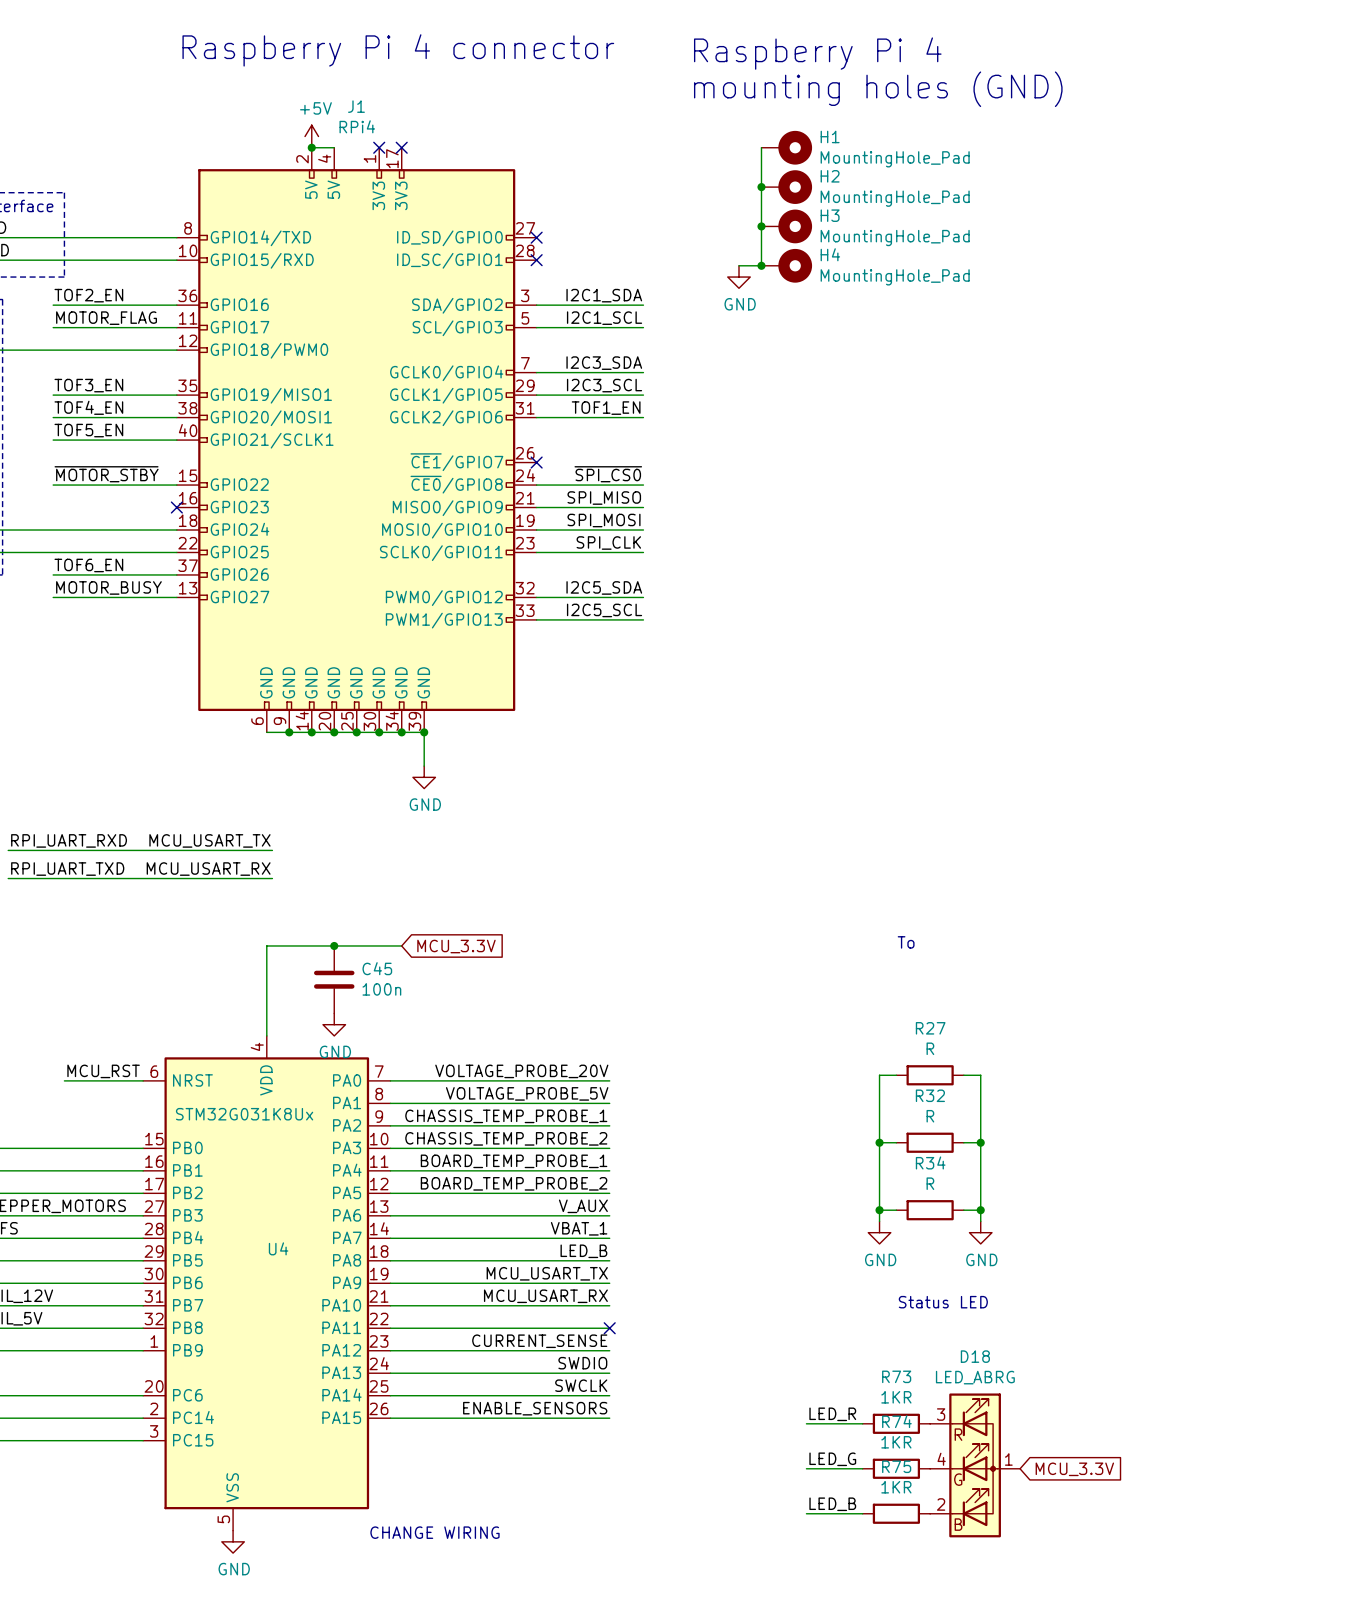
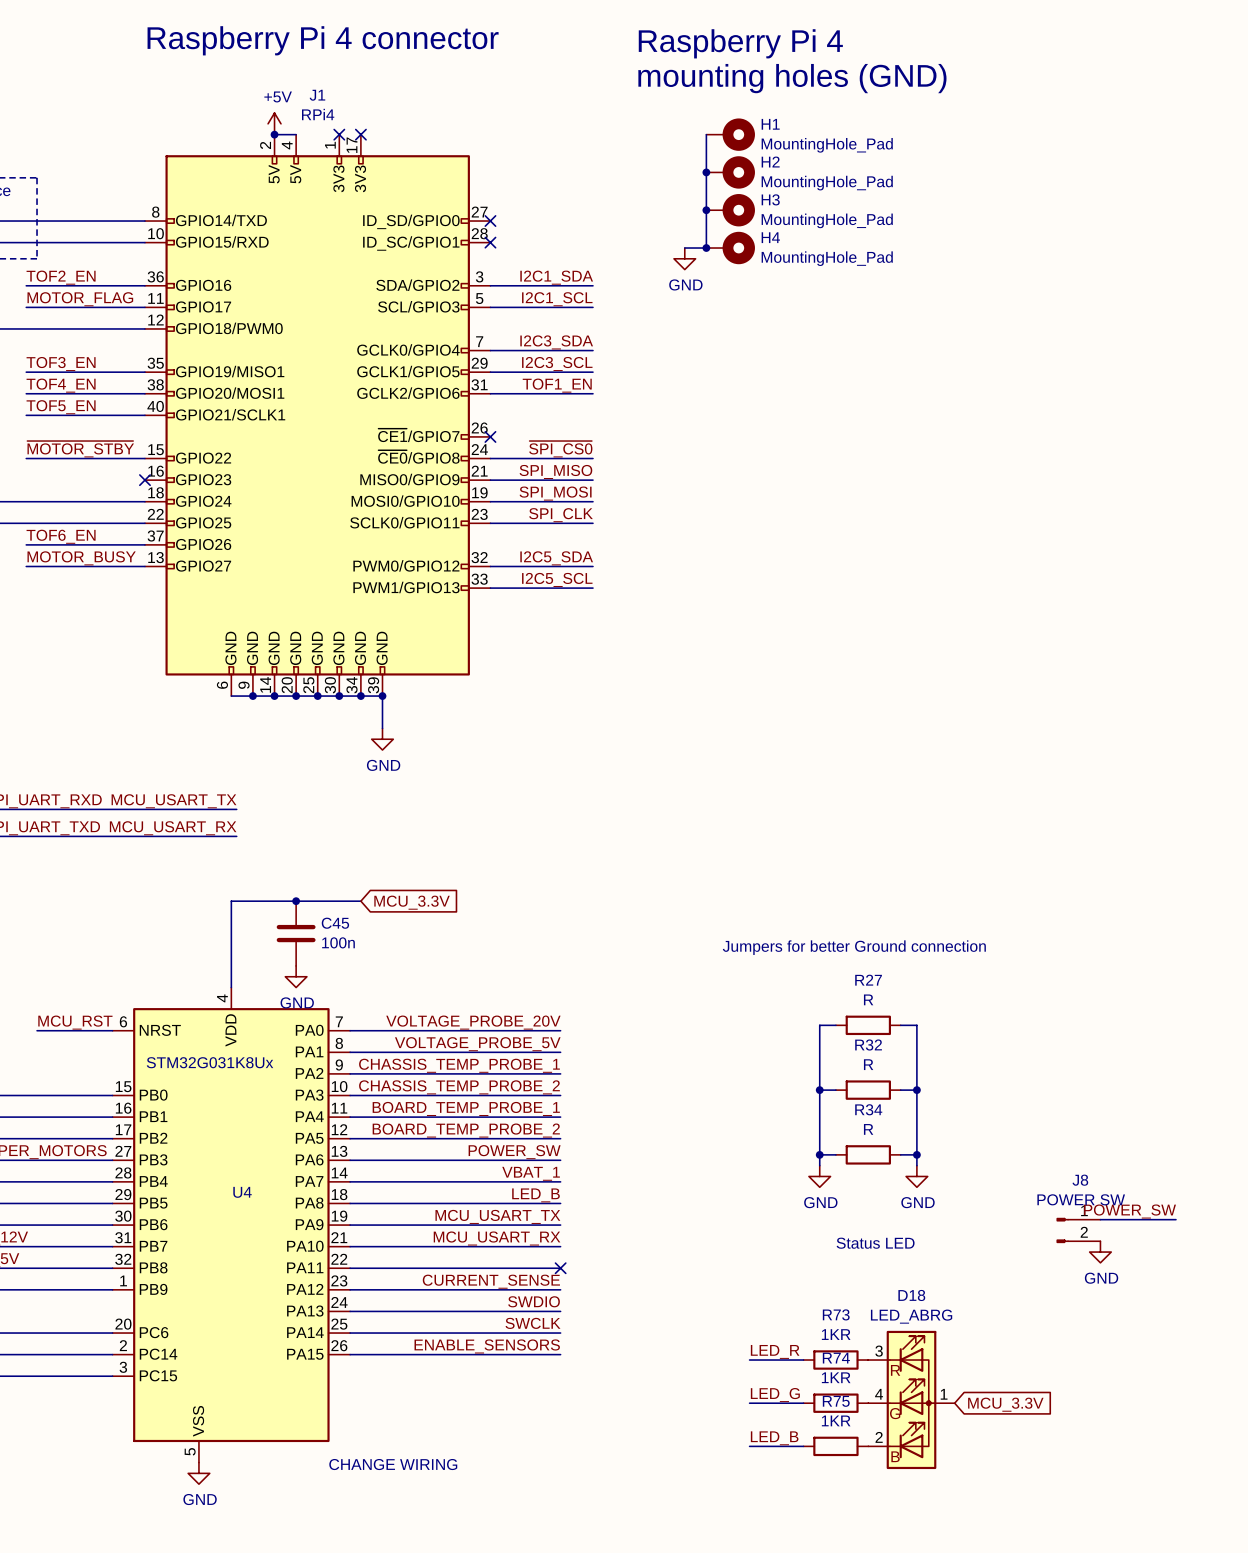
text: To (906, 942) -> none
text: none -> Jumpers for better Ground connection (854, 947)
label: V_AUX (583, 1206) -> POWER_SW (514, 1152)
label: none -> POWER_SW (1129, 1211)
wire: none -> (1100, 1219) (1176, 1219)
J8: none -> POWER SW (1078, 1230)
power symbol: none -> GND (1100, 1252)

